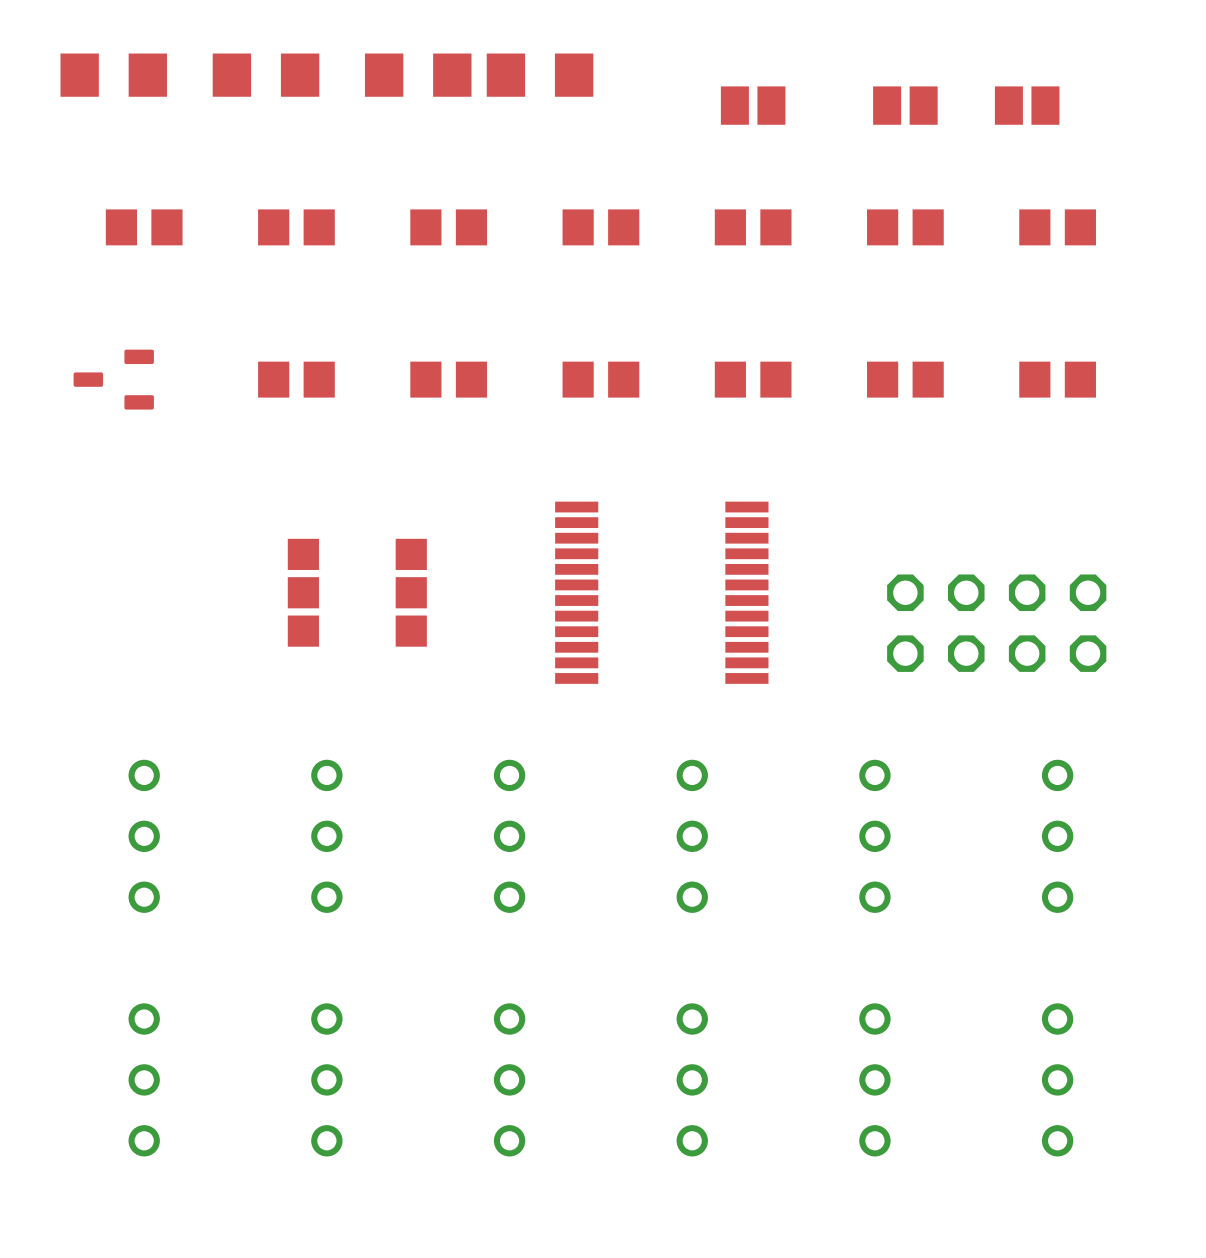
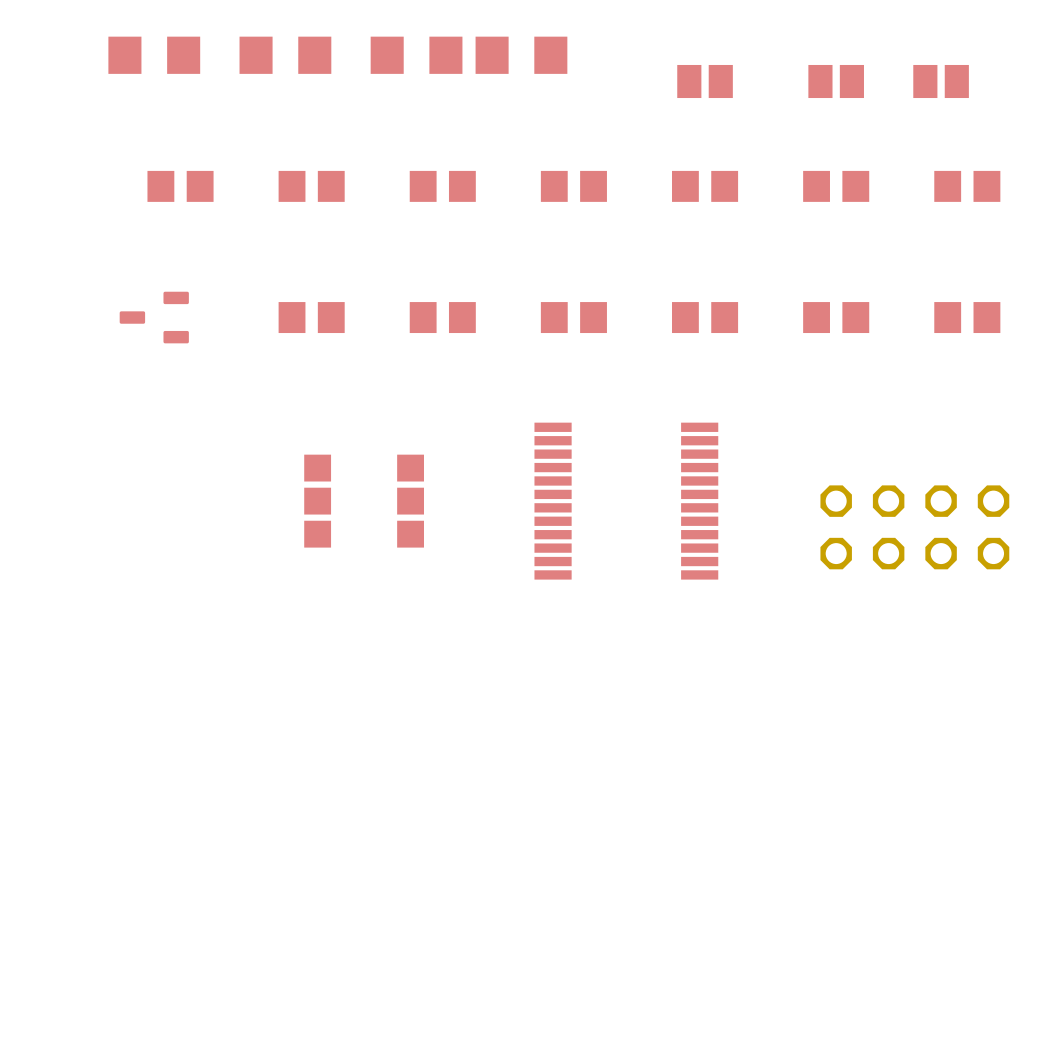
part: (144, 836) -> none
part: (326, 836) -> none
part: (509, 836) -> none
part: (692, 836) -> none
part: (874, 836) -> none
part: (1057, 836) -> none
part: (144, 1079) -> none
part: (326, 1079) -> none
part: (509, 1079) -> none
part: (692, 1079) -> none
part: (874, 1079) -> none
part: (1057, 1079) -> none

